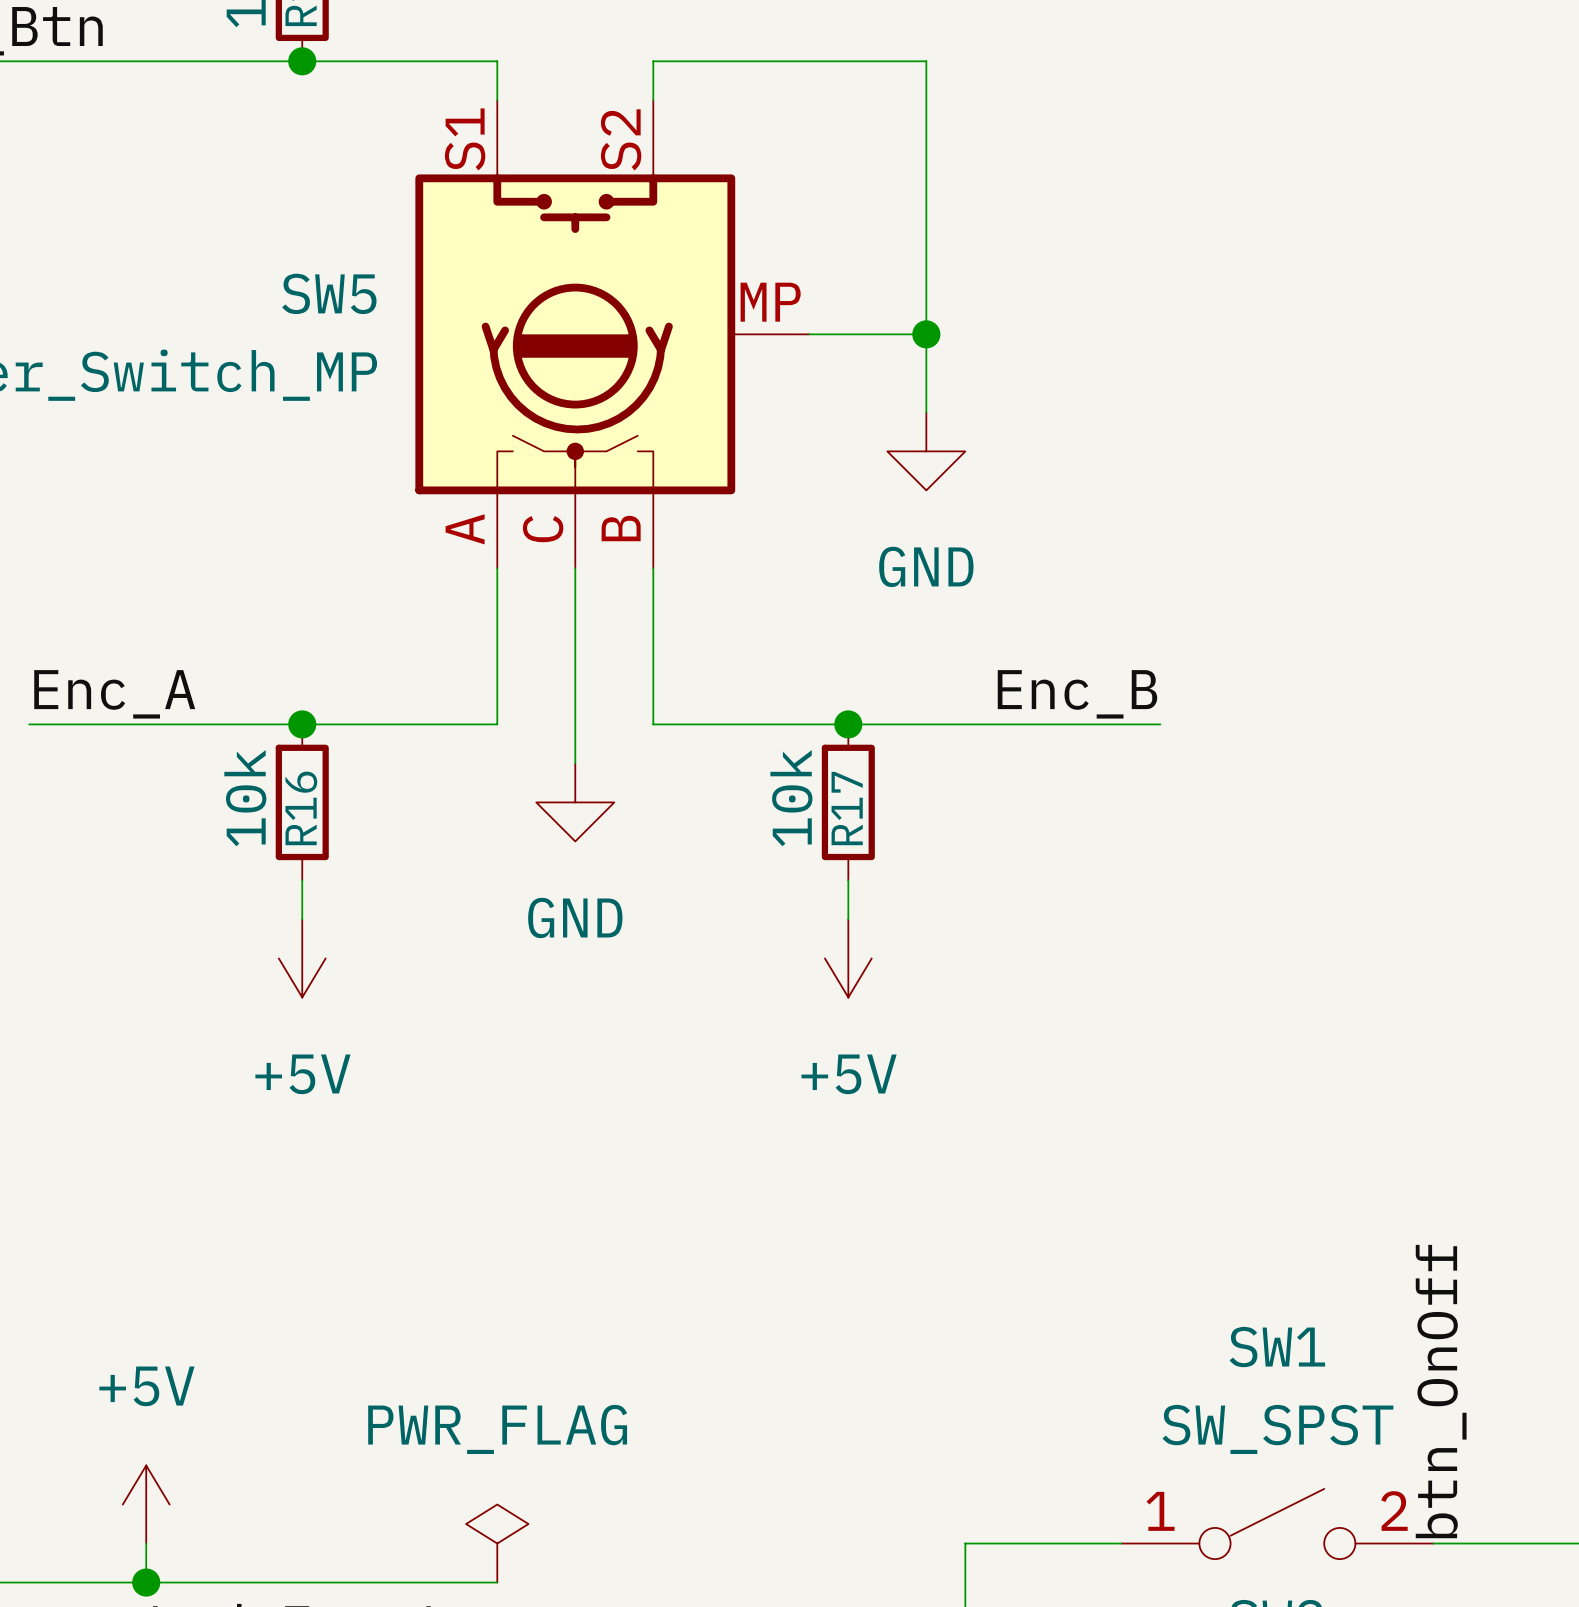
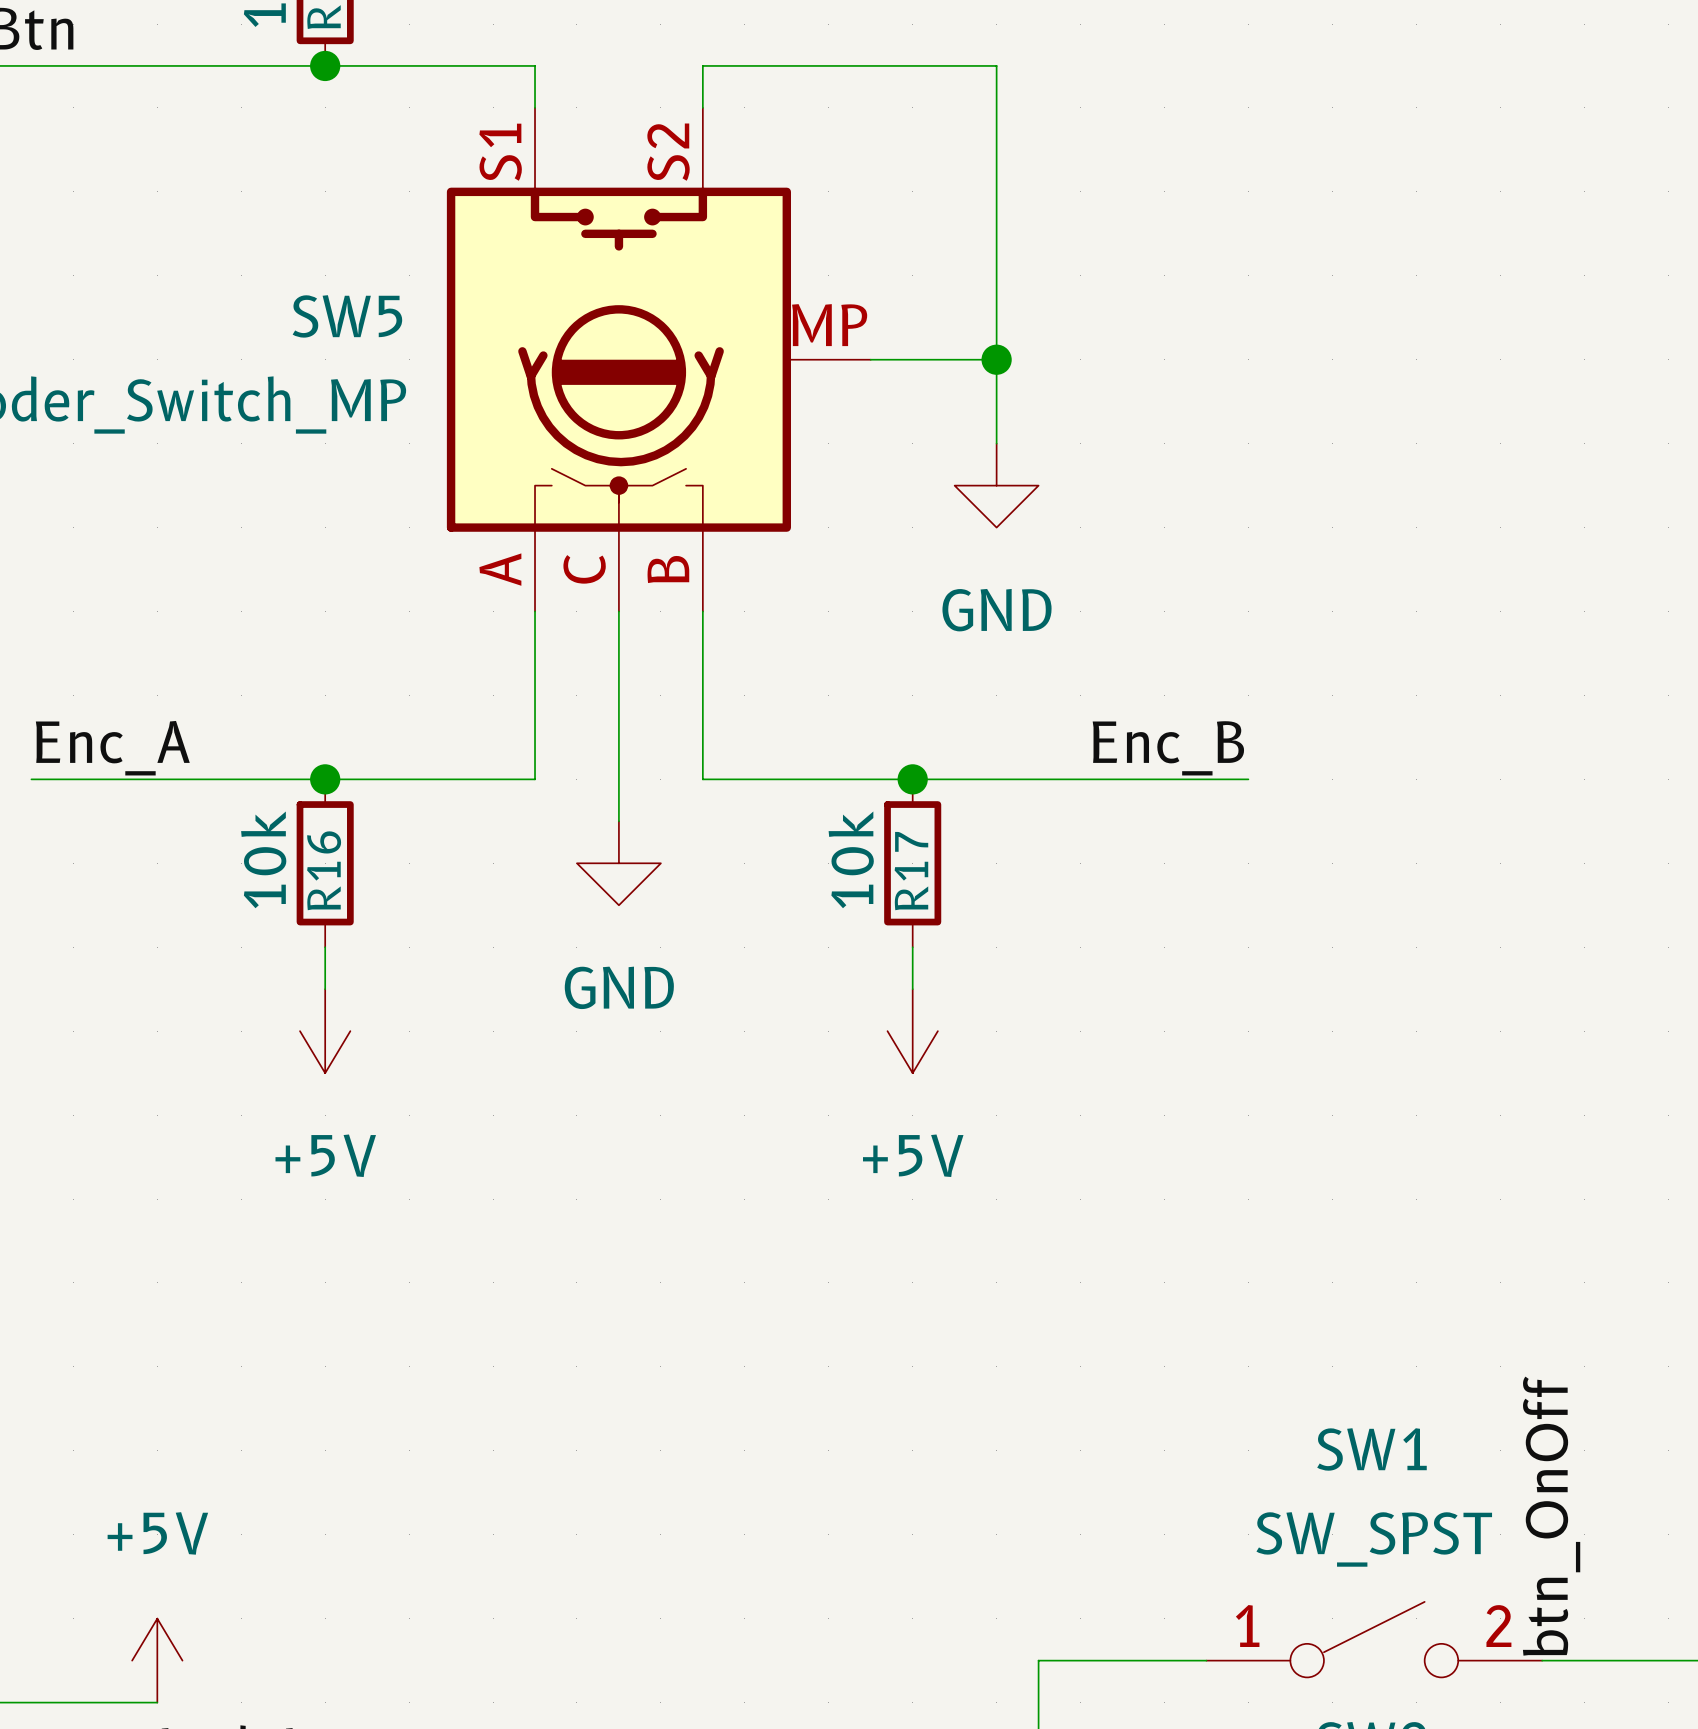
power symbol position: +5V (146, 1504) -> +5V (157, 1660)
wire: (146, 1543) (146, 1582) (497, 1582) -> none
power symbol: PWR_FLAG (497, 1543) -> none
junction: (146, 1582) -> none

